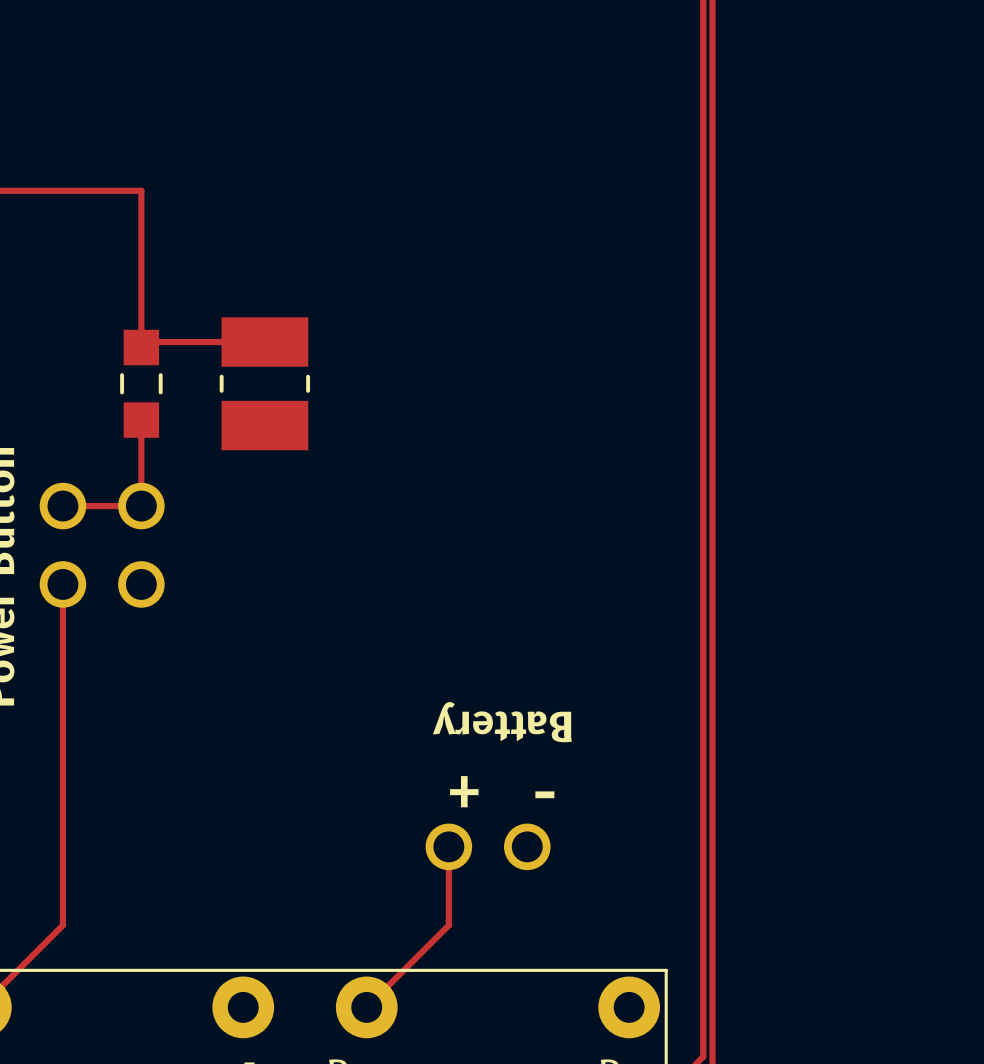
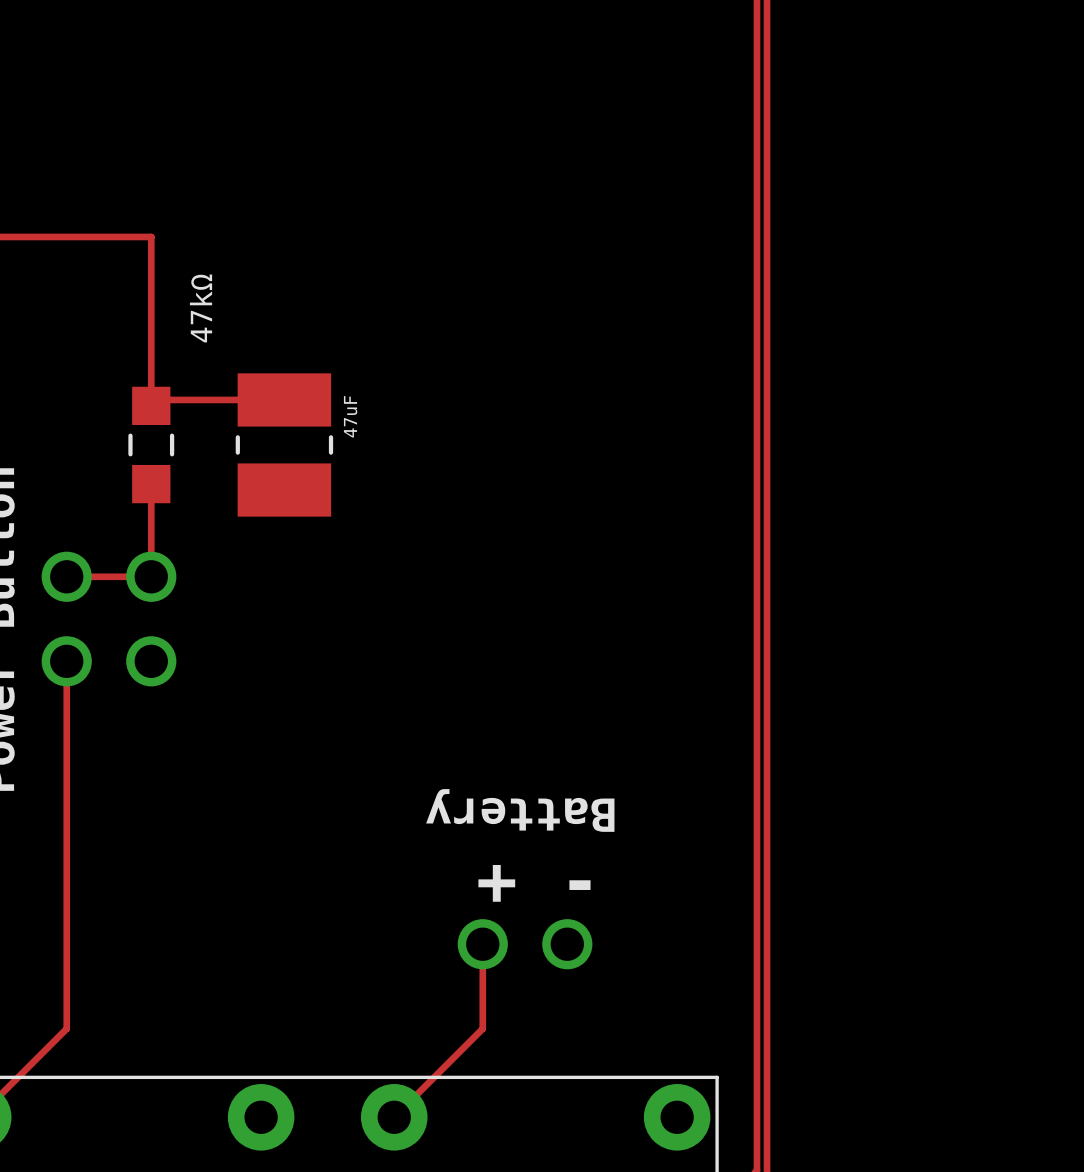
part value: none -> 47kΩ (201, 308)
part value: none -> 47uF (350, 416)

